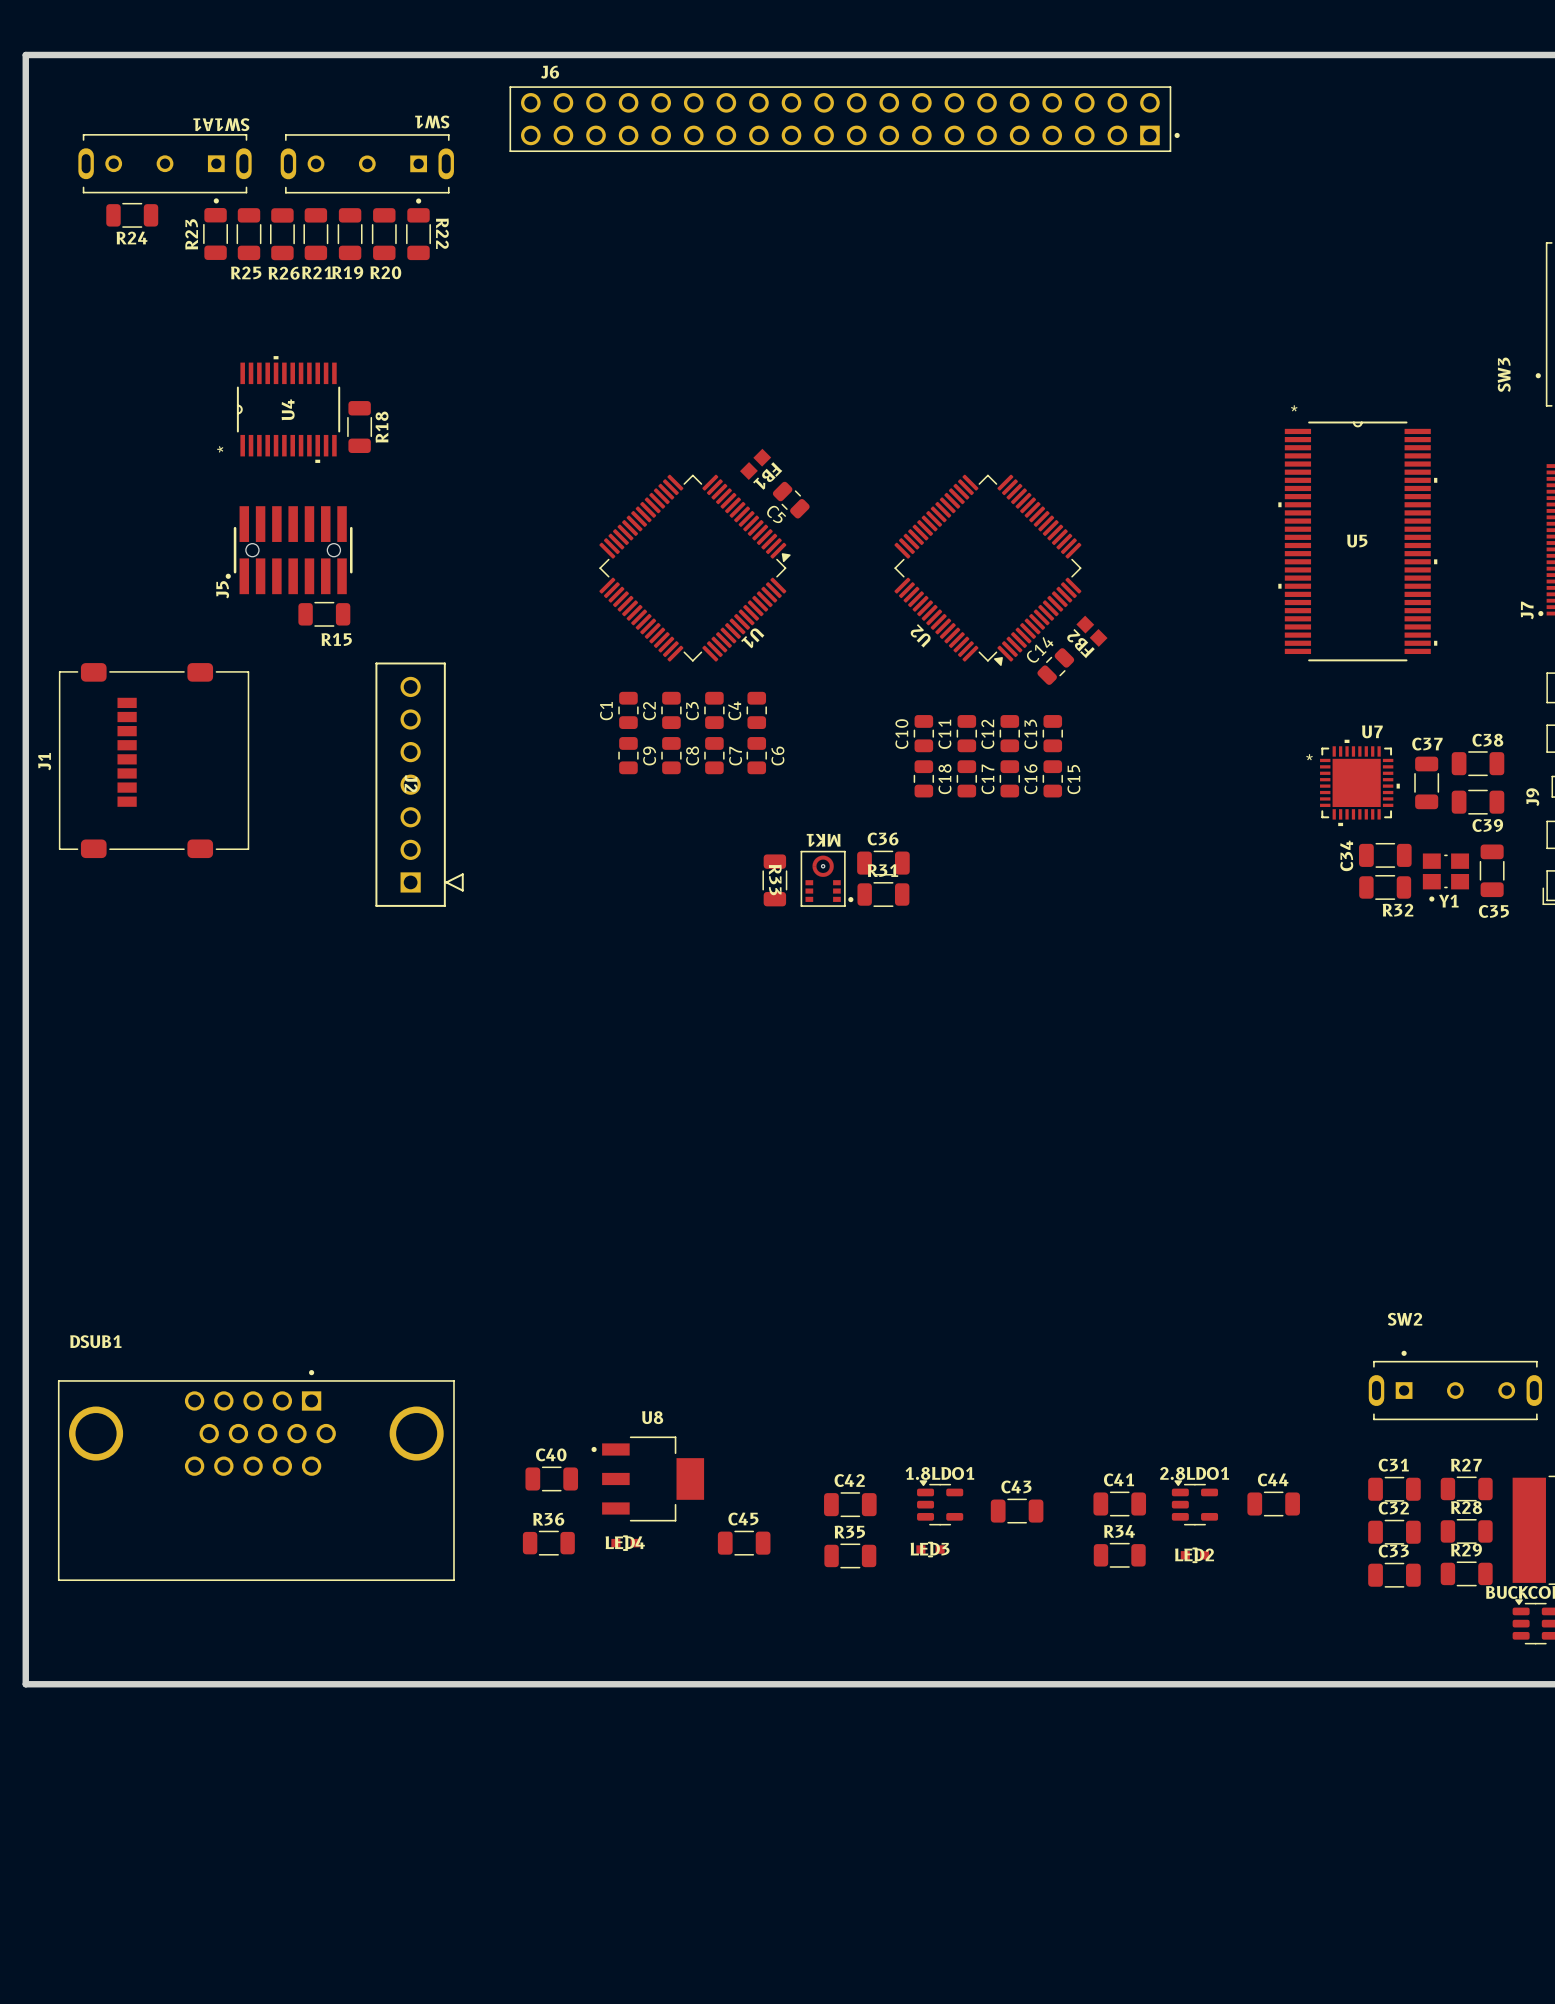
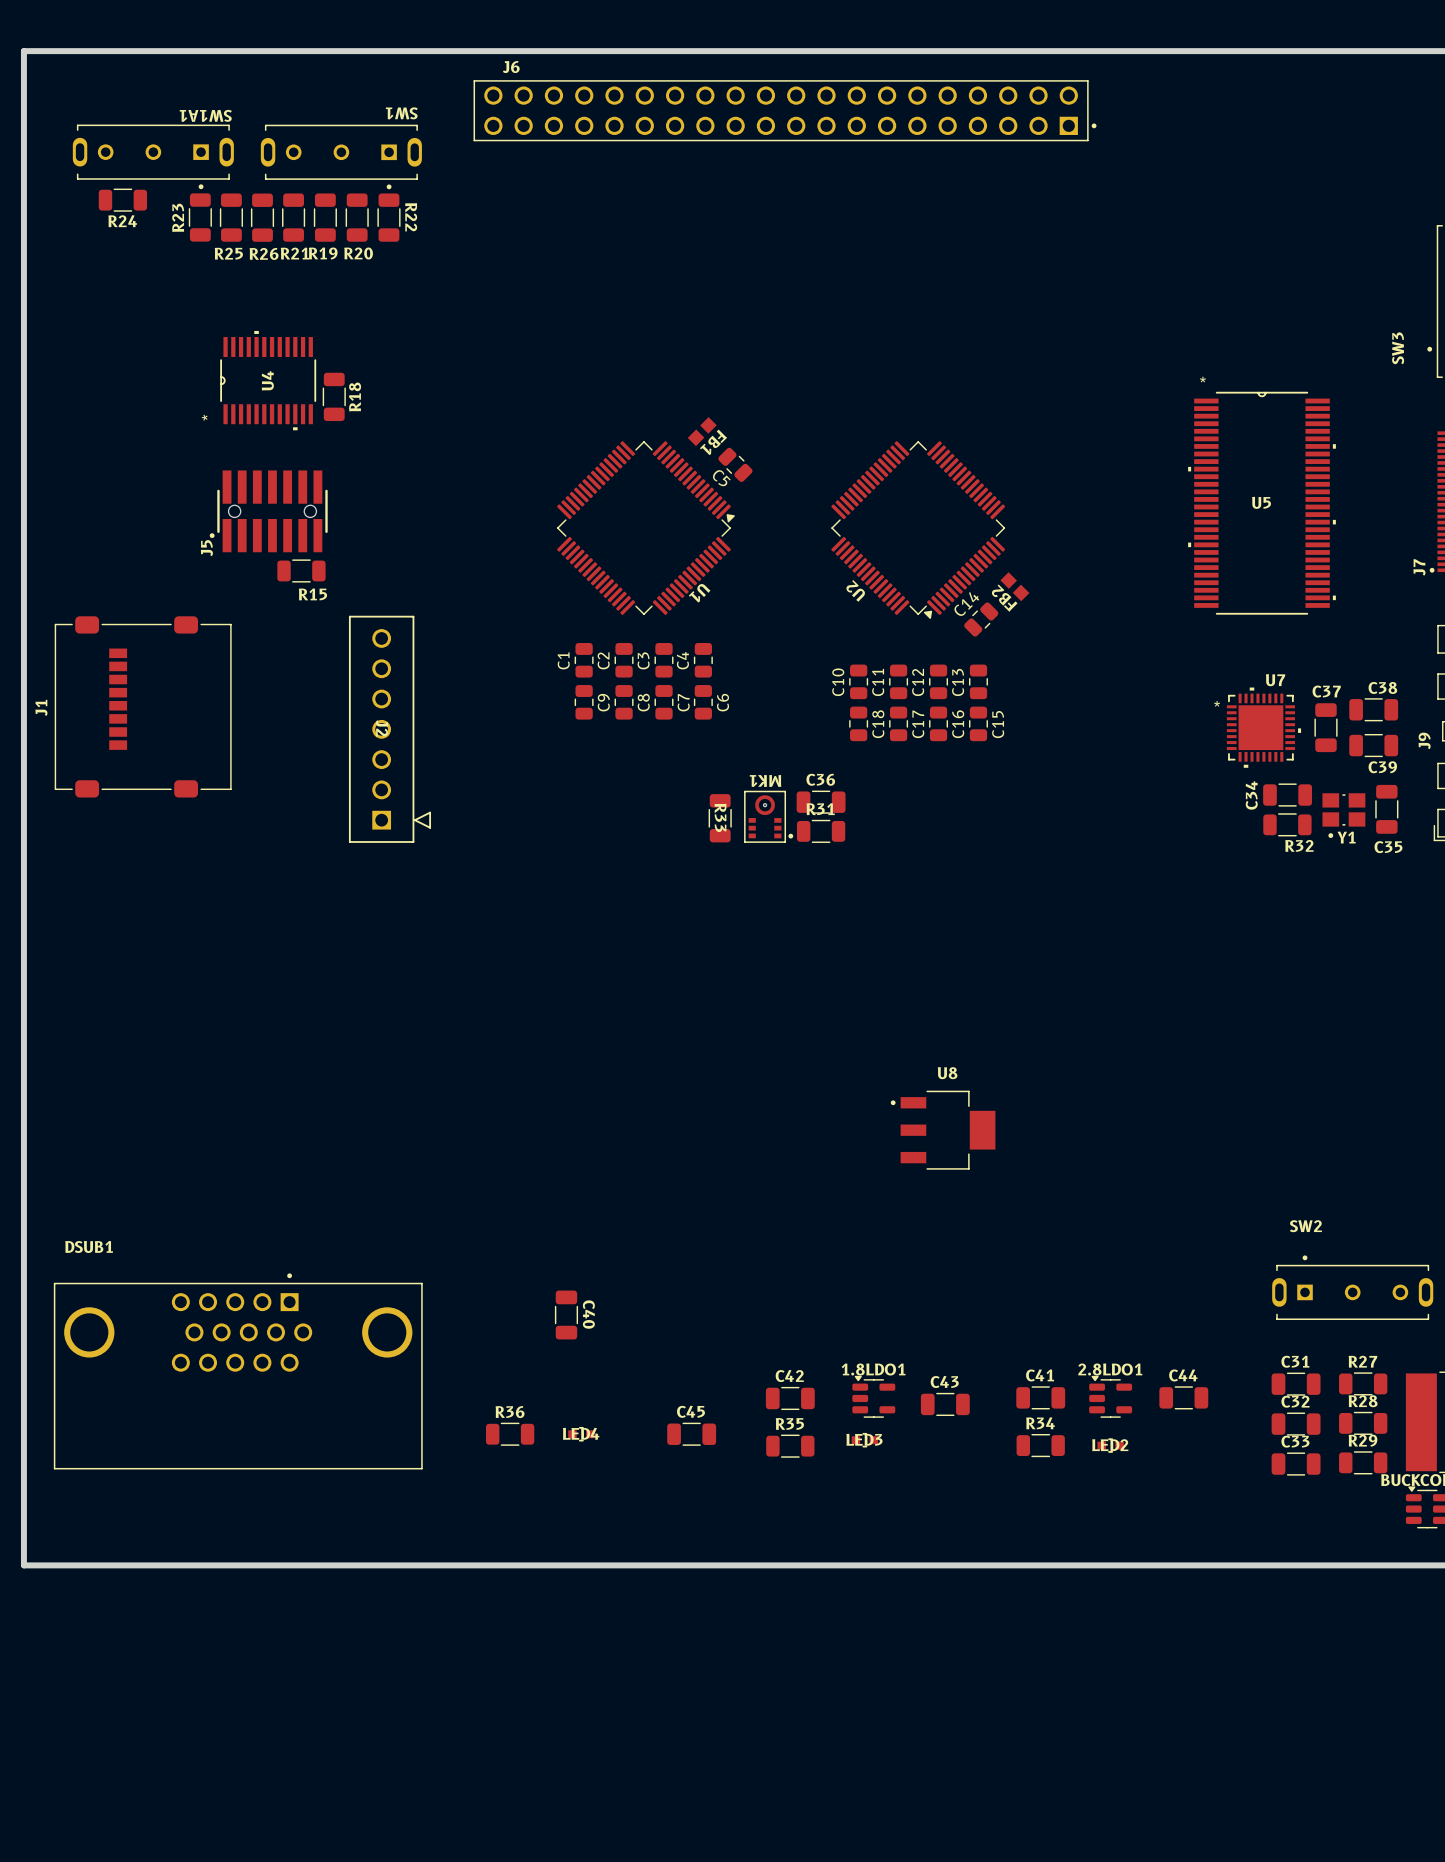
C40 rotation: 0° (551, 1478) -> 90° clockwise (566, 1315)
C40 position: (551, 1478) -> (566, 1315)
U8 position: (647, 1478) -> (943, 1130)

